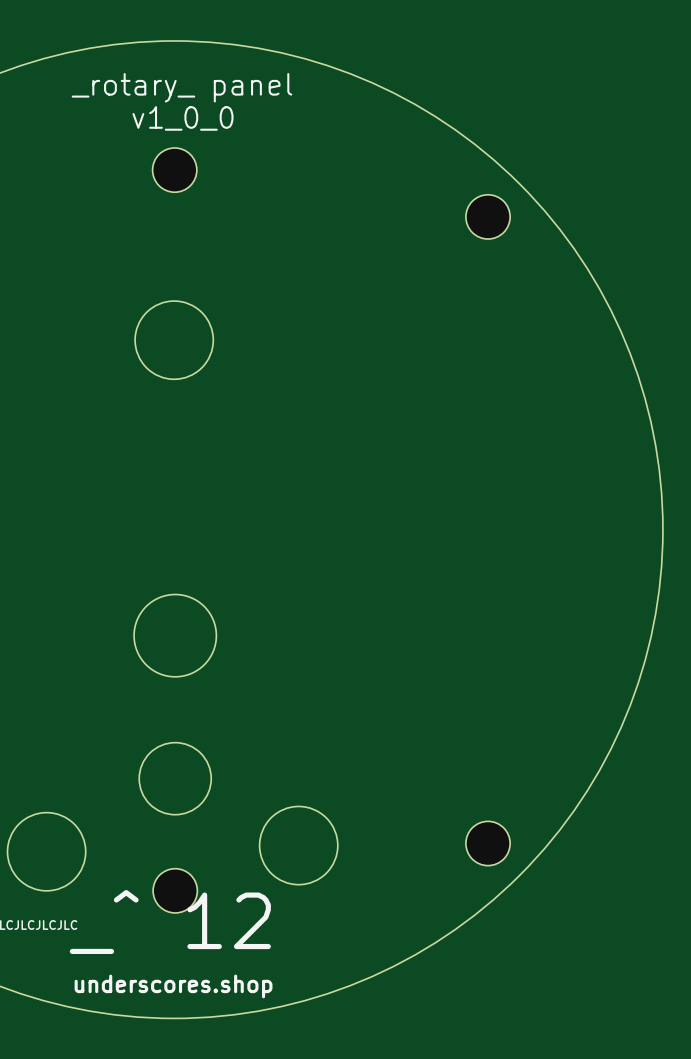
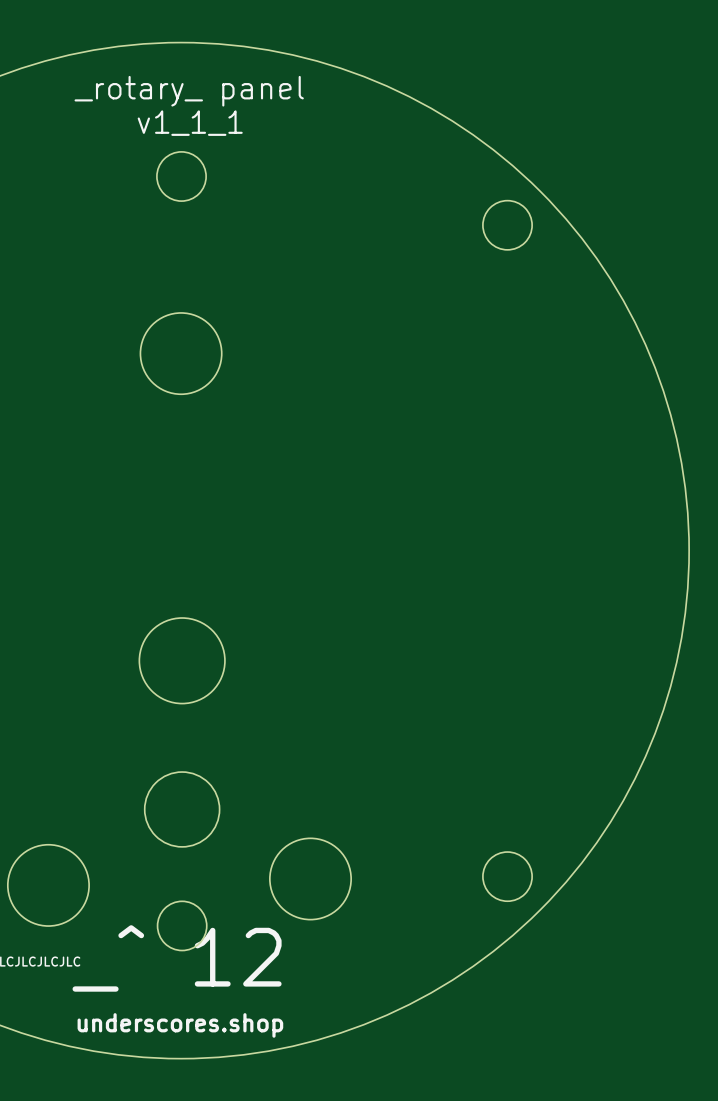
text: v1_0_0 (182, 118) -> v1_1_1 (190, 123)
round board edge: none -> [156, 151, 207, 202]
part: (174, 170) -> none
round board edge: none -> [482, 200, 533, 251]
part: (488, 216) -> none
round board edge: none -> [482, 851, 533, 902]
part: (488, 843) -> none
round board edge: none -> [156, 900, 208, 952]
part: (175, 890) -> none

